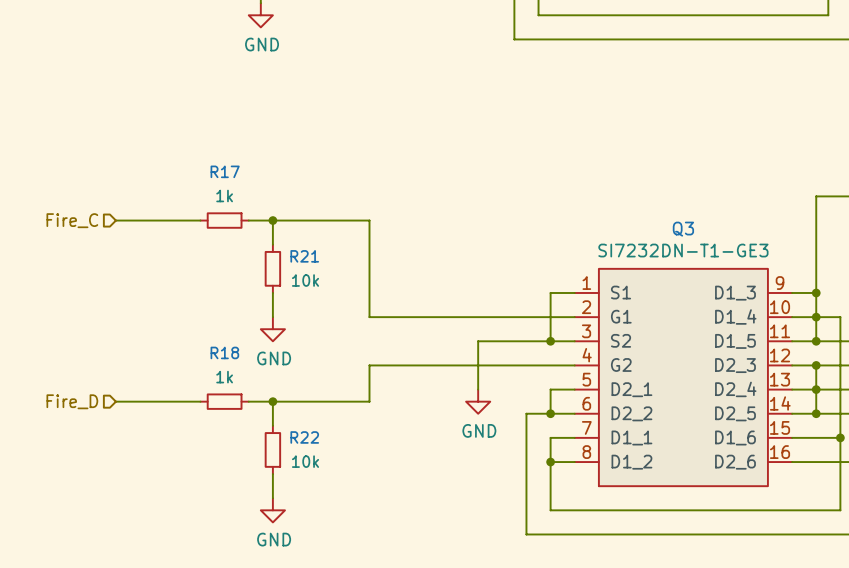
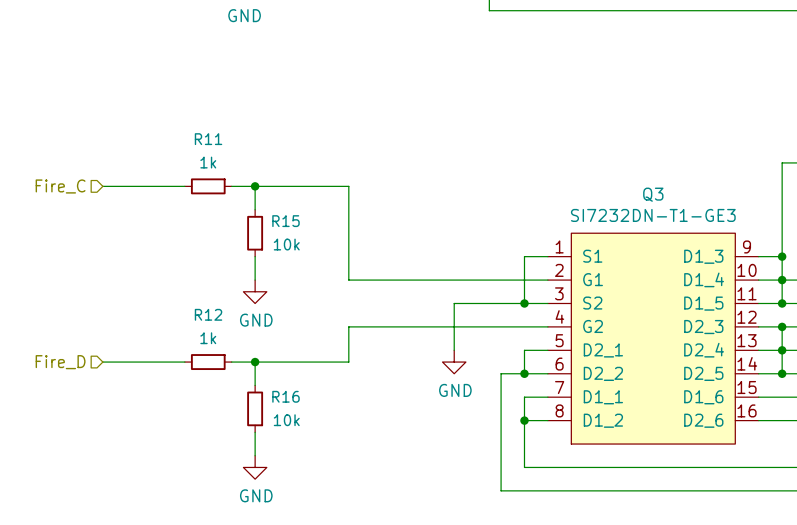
R17 name: R17 (225, 171) -> R11 (208, 139)
R21 name: R21 (304, 256) -> R15 (285, 221)
R18 name: R18 (224, 352) -> R12 (208, 314)
R22 name: R22 (304, 437) -> R16 (285, 396)

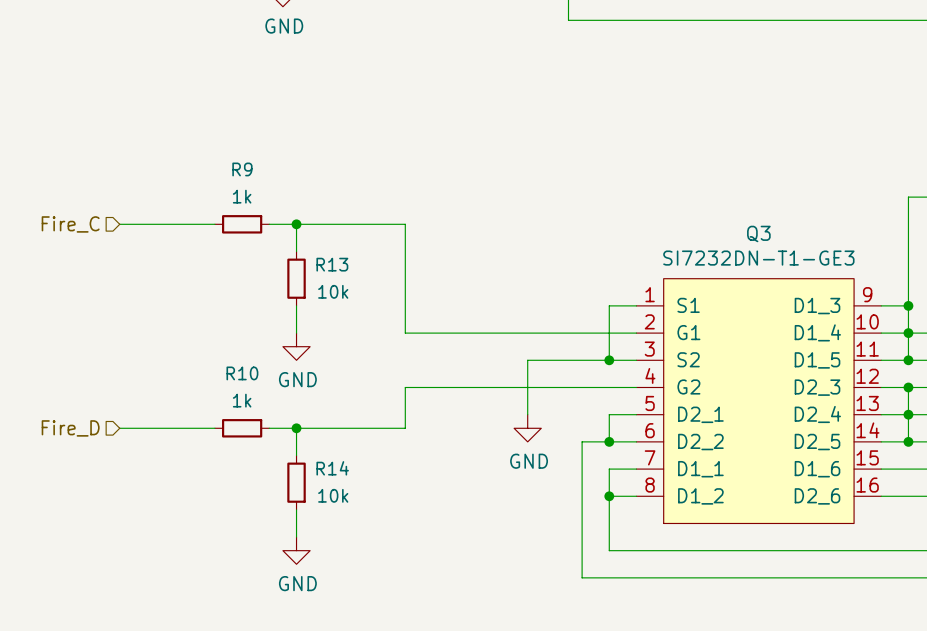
R11 name: R11 (208, 139) -> R9 (242, 169)
R15 name: R15 (285, 221) -> R13 (332, 264)
R12 name: R12 (208, 314) -> R10 (242, 373)
R16 name: R16 (285, 396) -> R14 (332, 468)

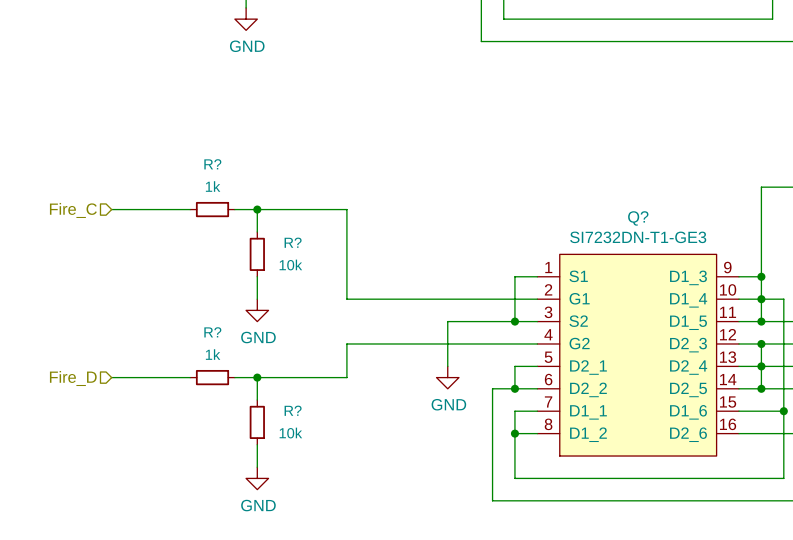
R9 name: R9 (242, 169) -> R? (212, 164)
Q3 name: Q3 (758, 233) -> Q? (638, 218)
R13 name: R13 (332, 264) -> R? (293, 242)
R10 name: R10 (242, 373) -> R? (212, 332)
R14 name: R14 (332, 468) -> R? (293, 410)

